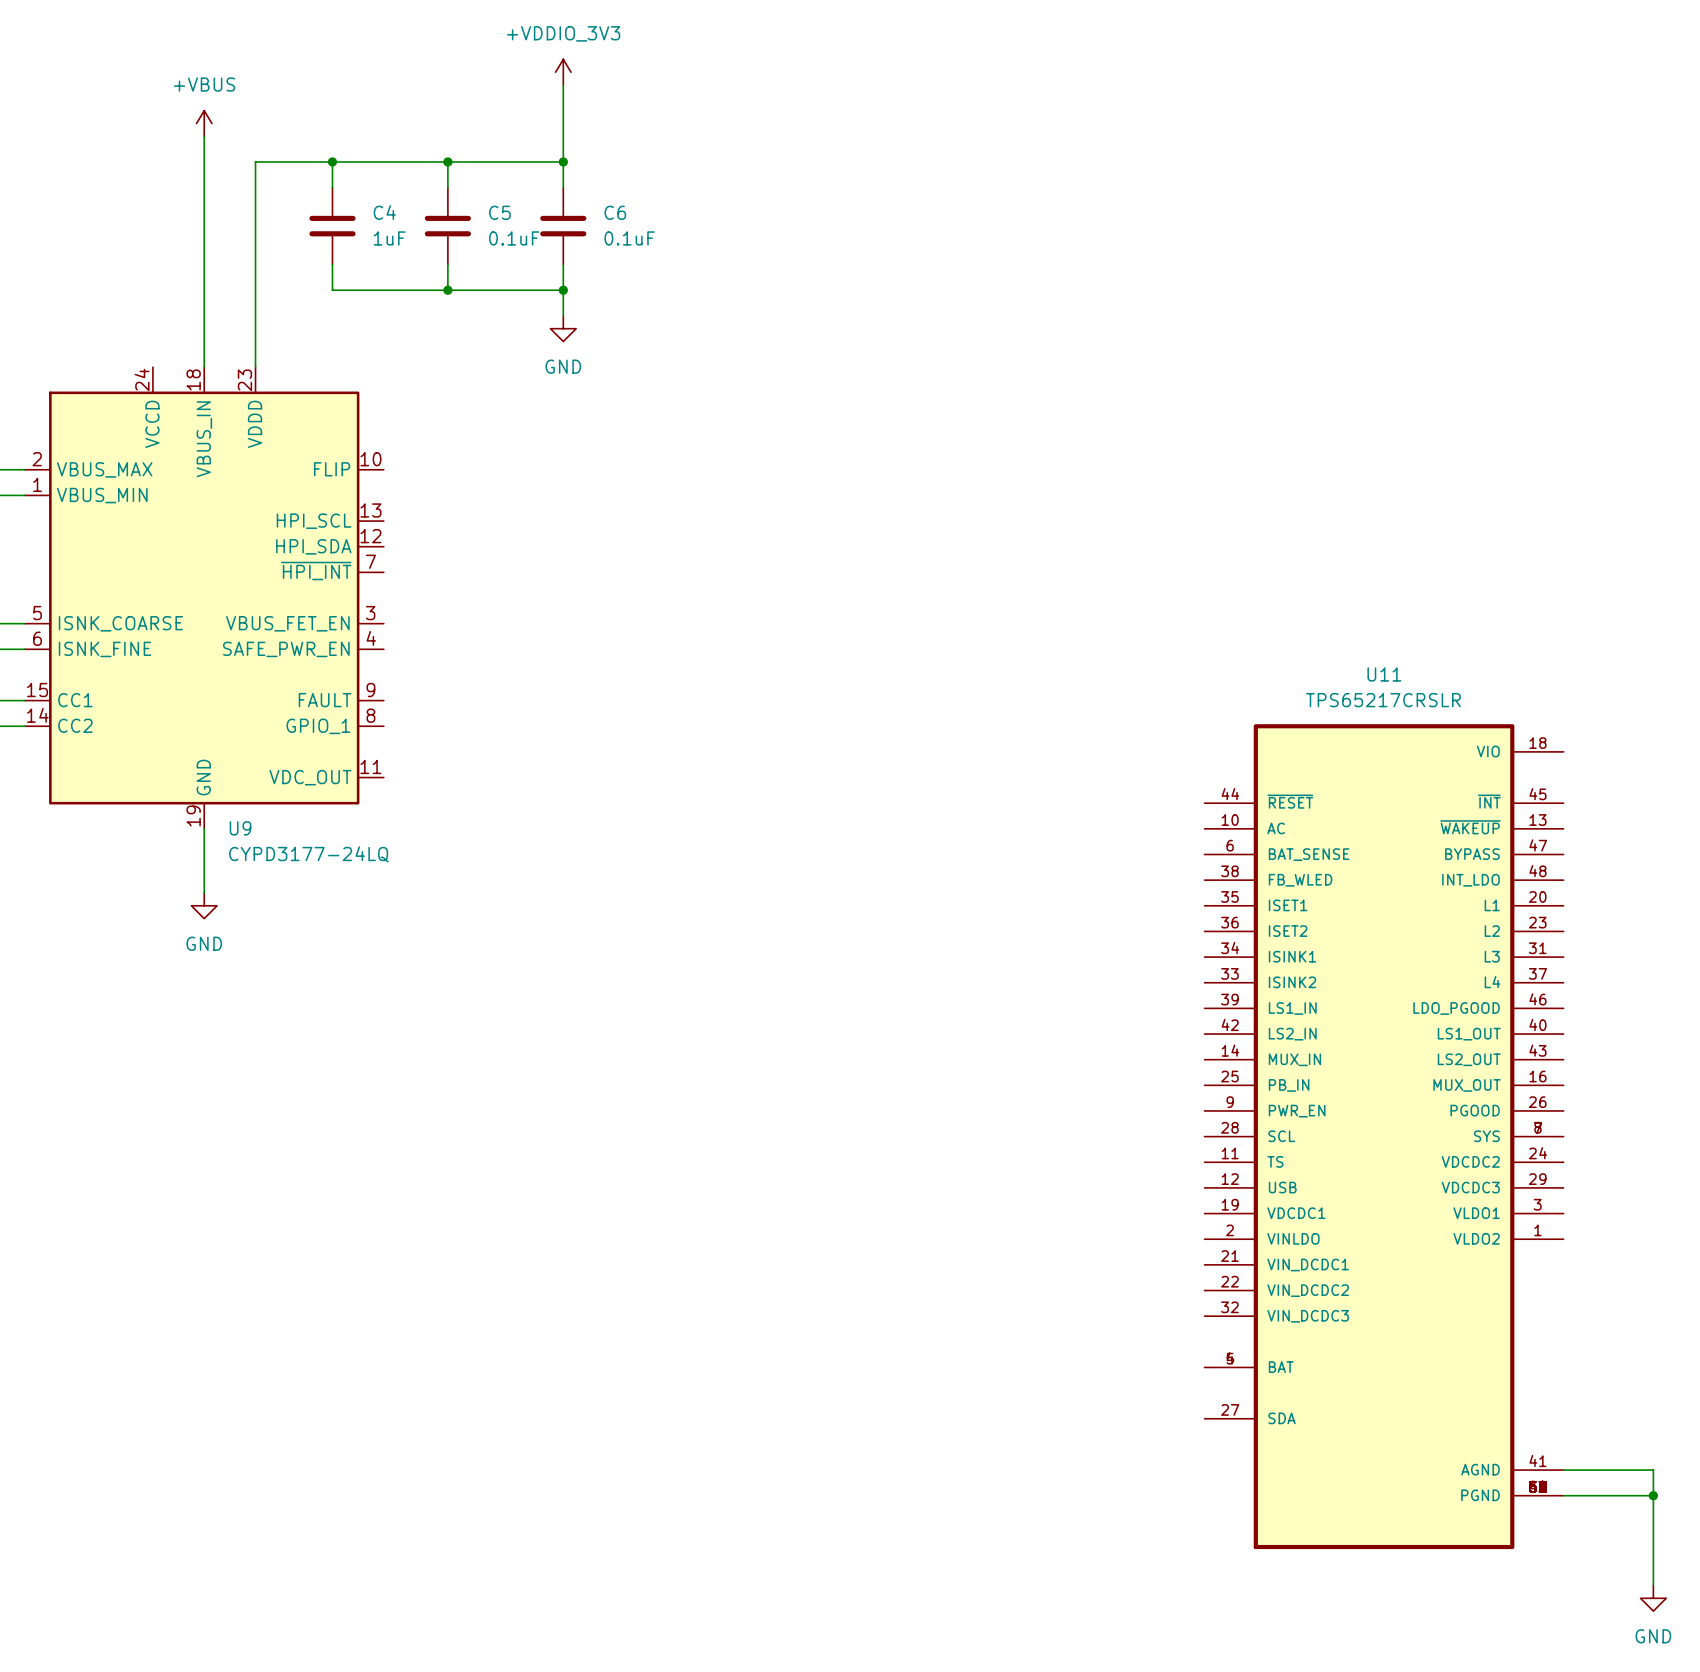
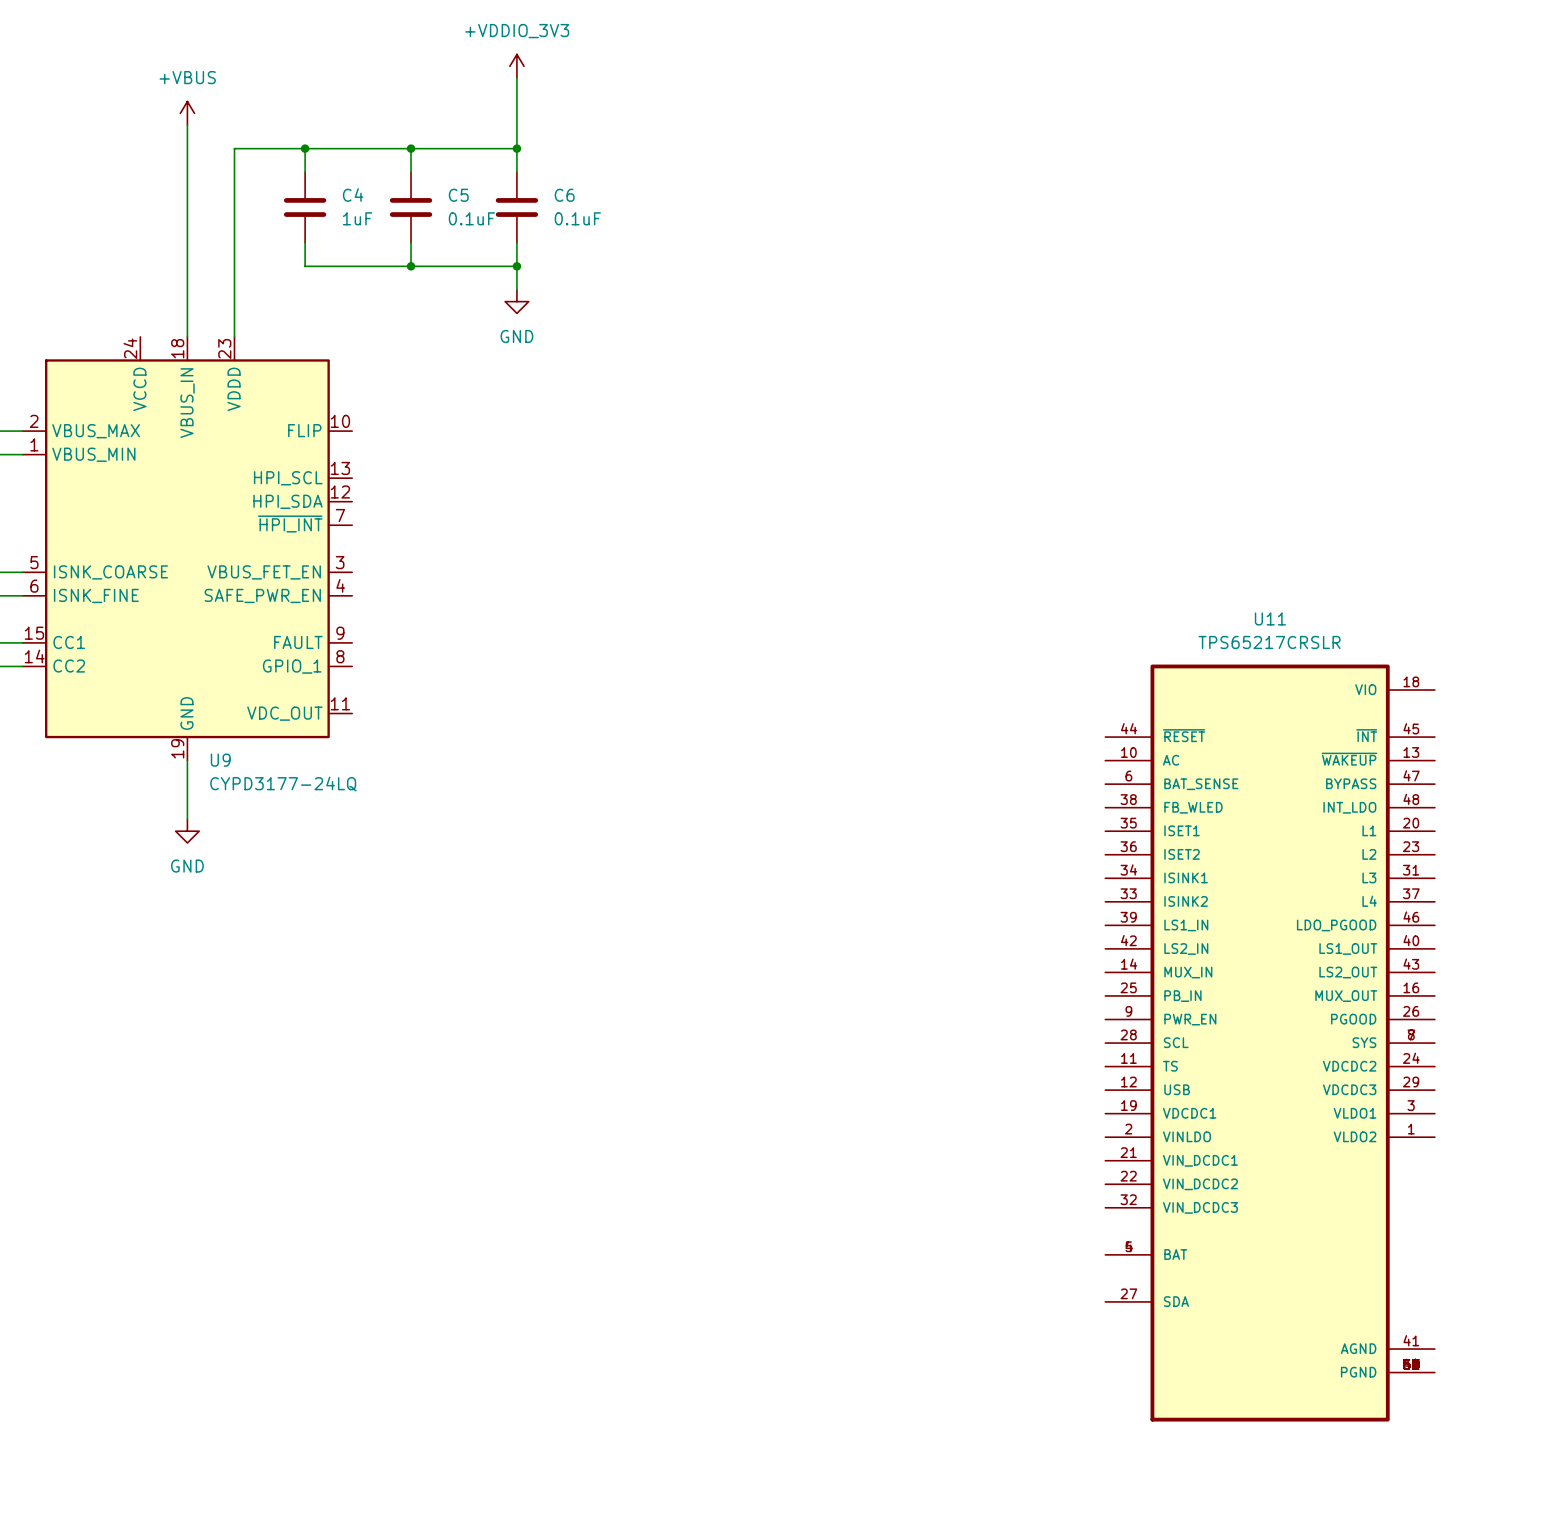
wire: (1563, 1470) (1653, 1470) (1653, 1585) -> none
wire: (1563, 1495) (1653, 1495) -> none
junction: (1653, 1495) -> none
power symbol: GND (1653, 1598) -> none

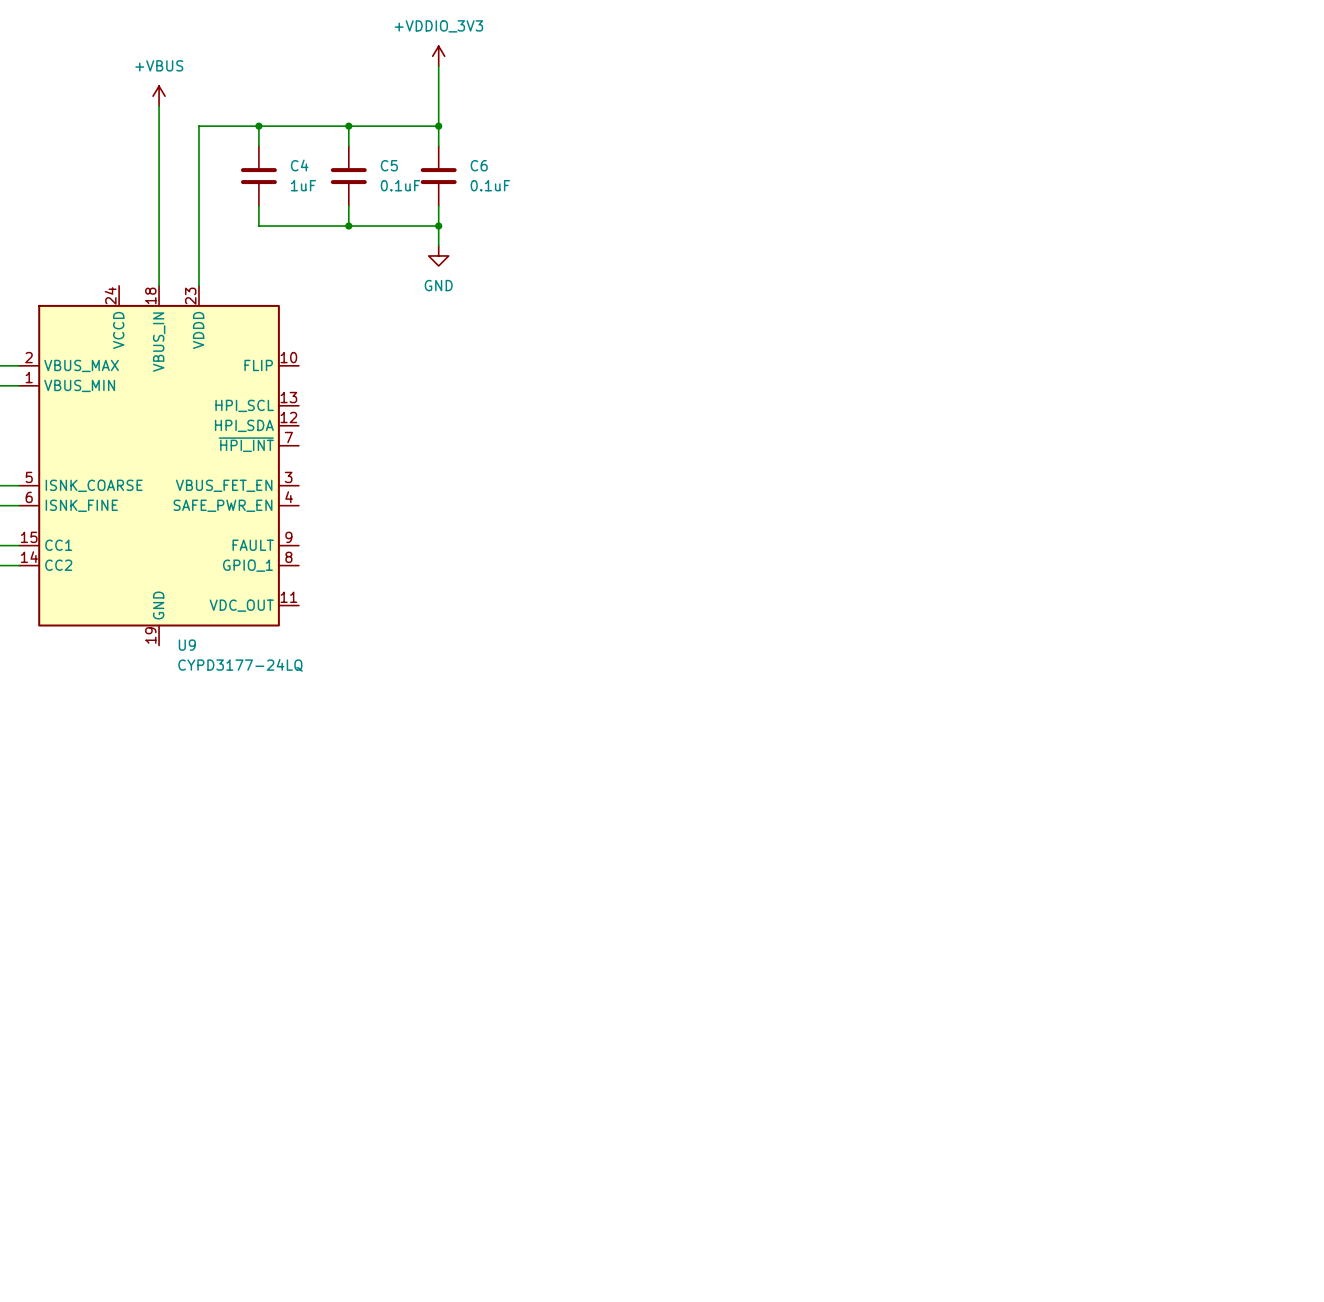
wire: (187, 760) (187, 819) -> none
power symbol: GND (187, 831) -> none
U11: TPS65217CRSLR (1270, 1043) -> none

